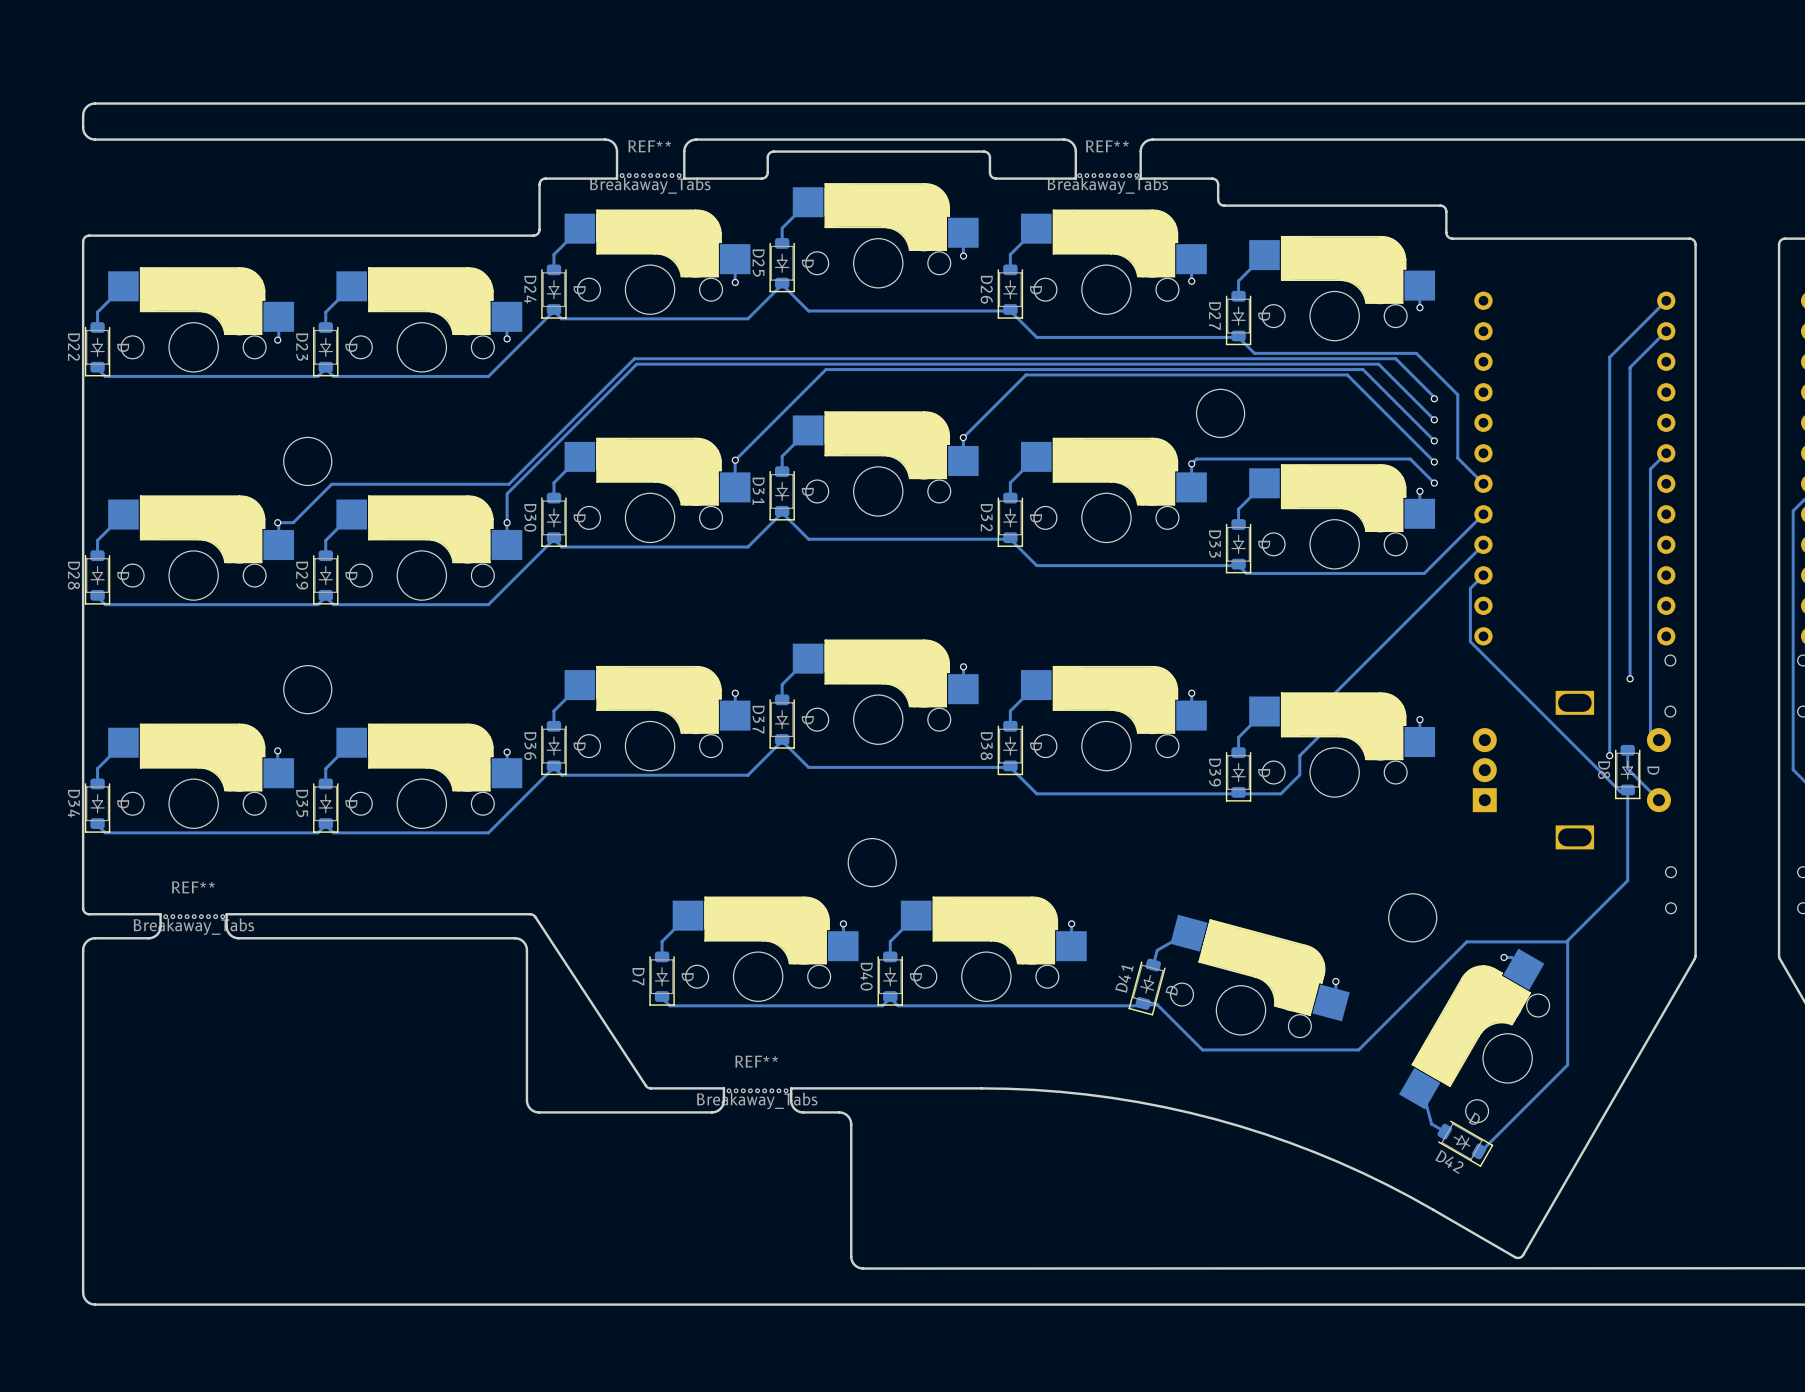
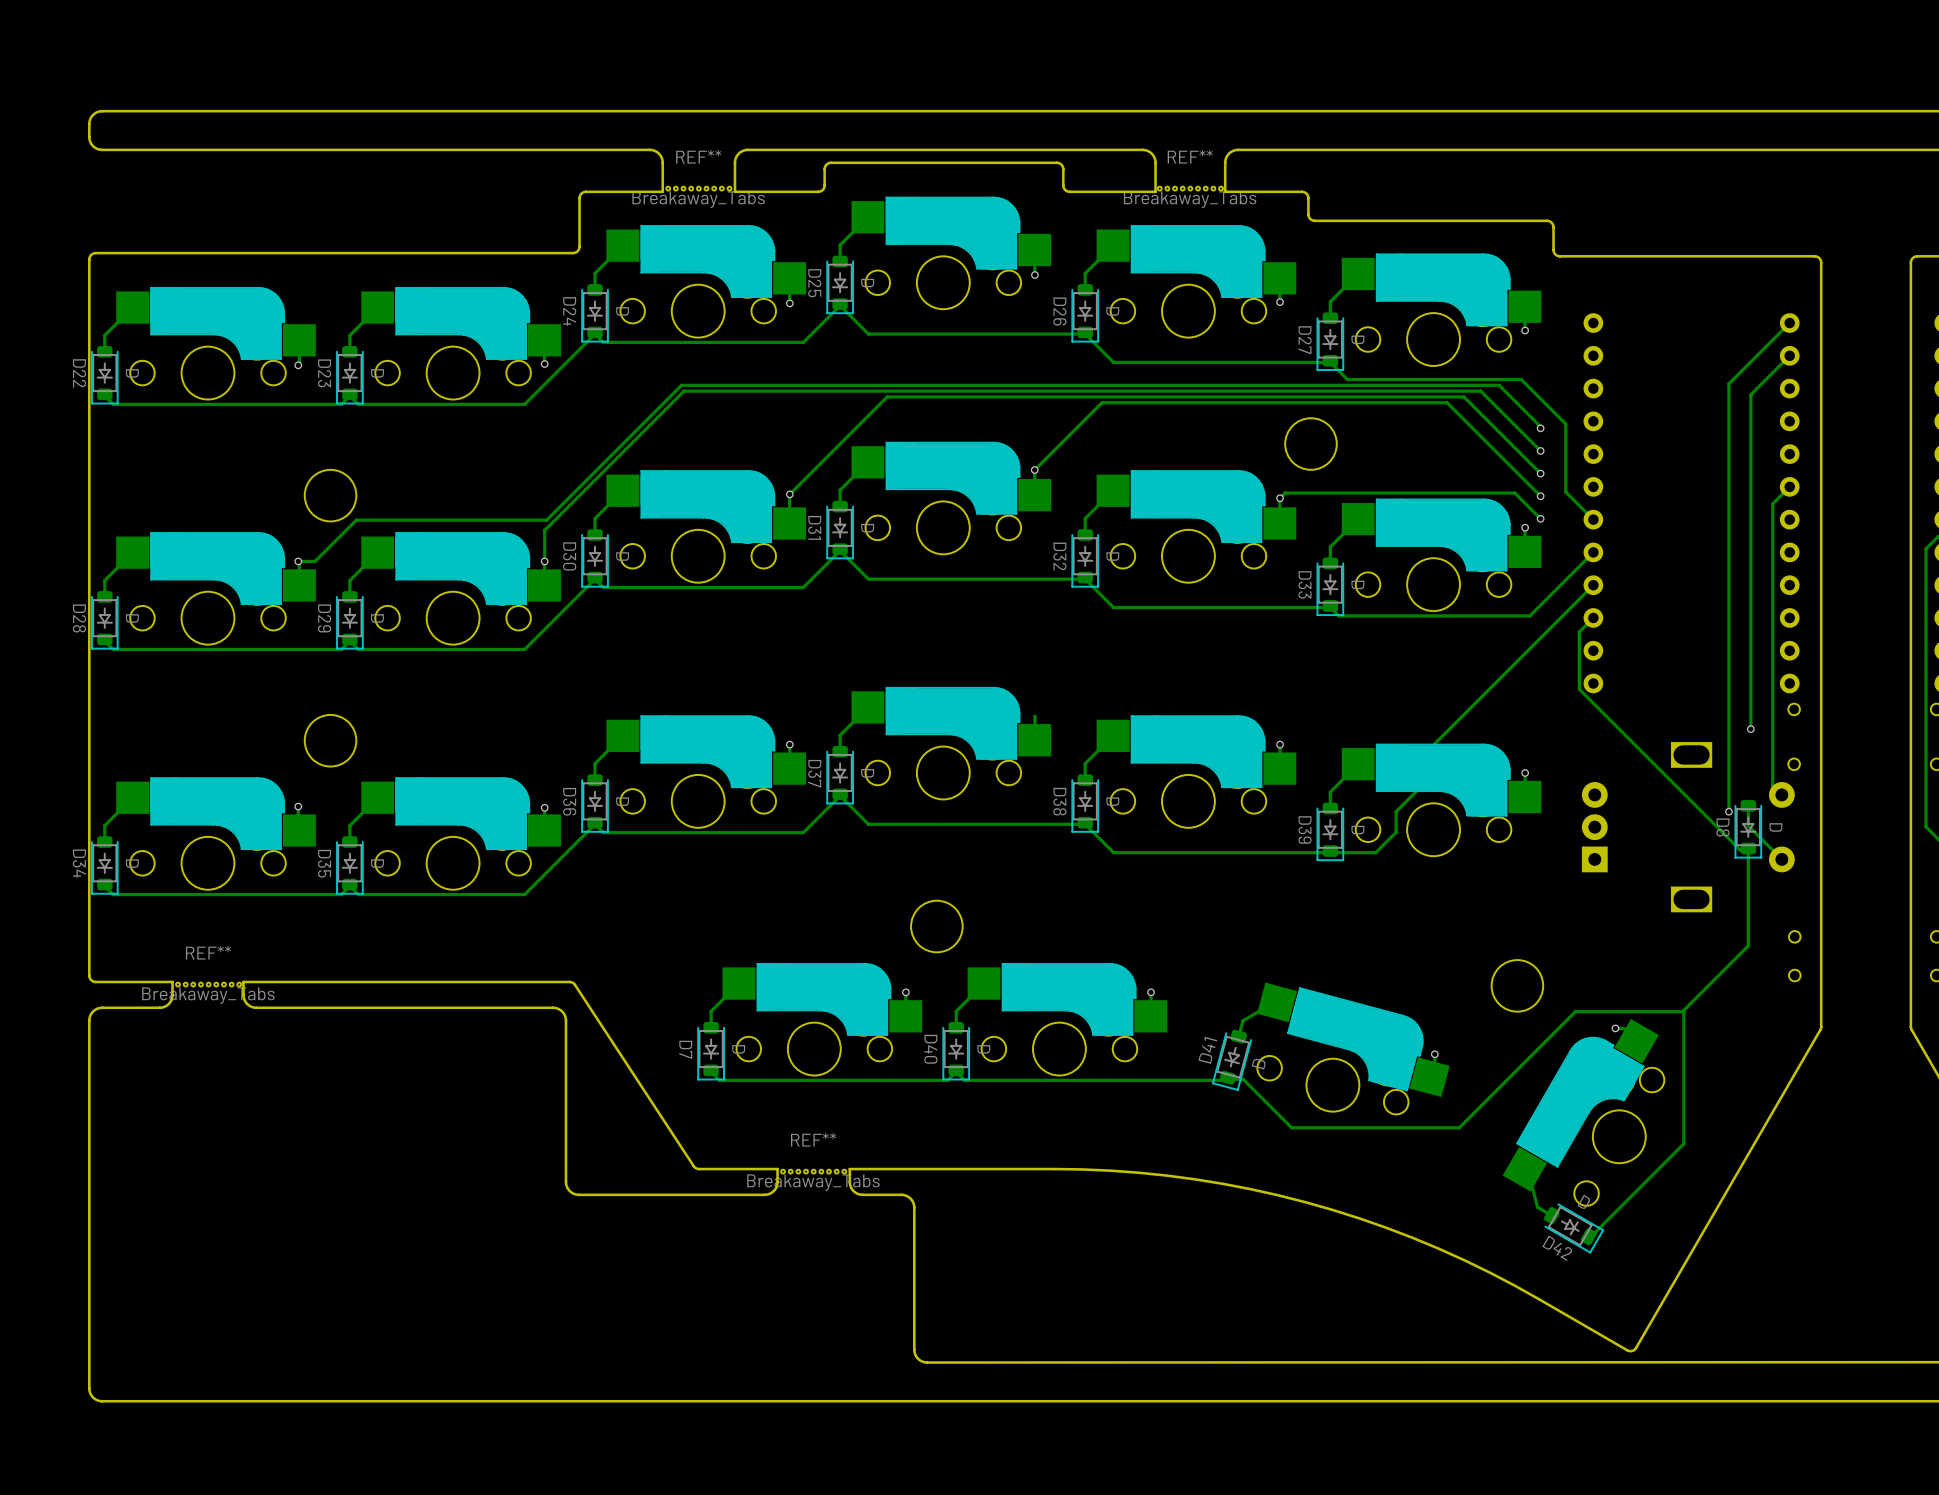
via: (963, 666) -> none

